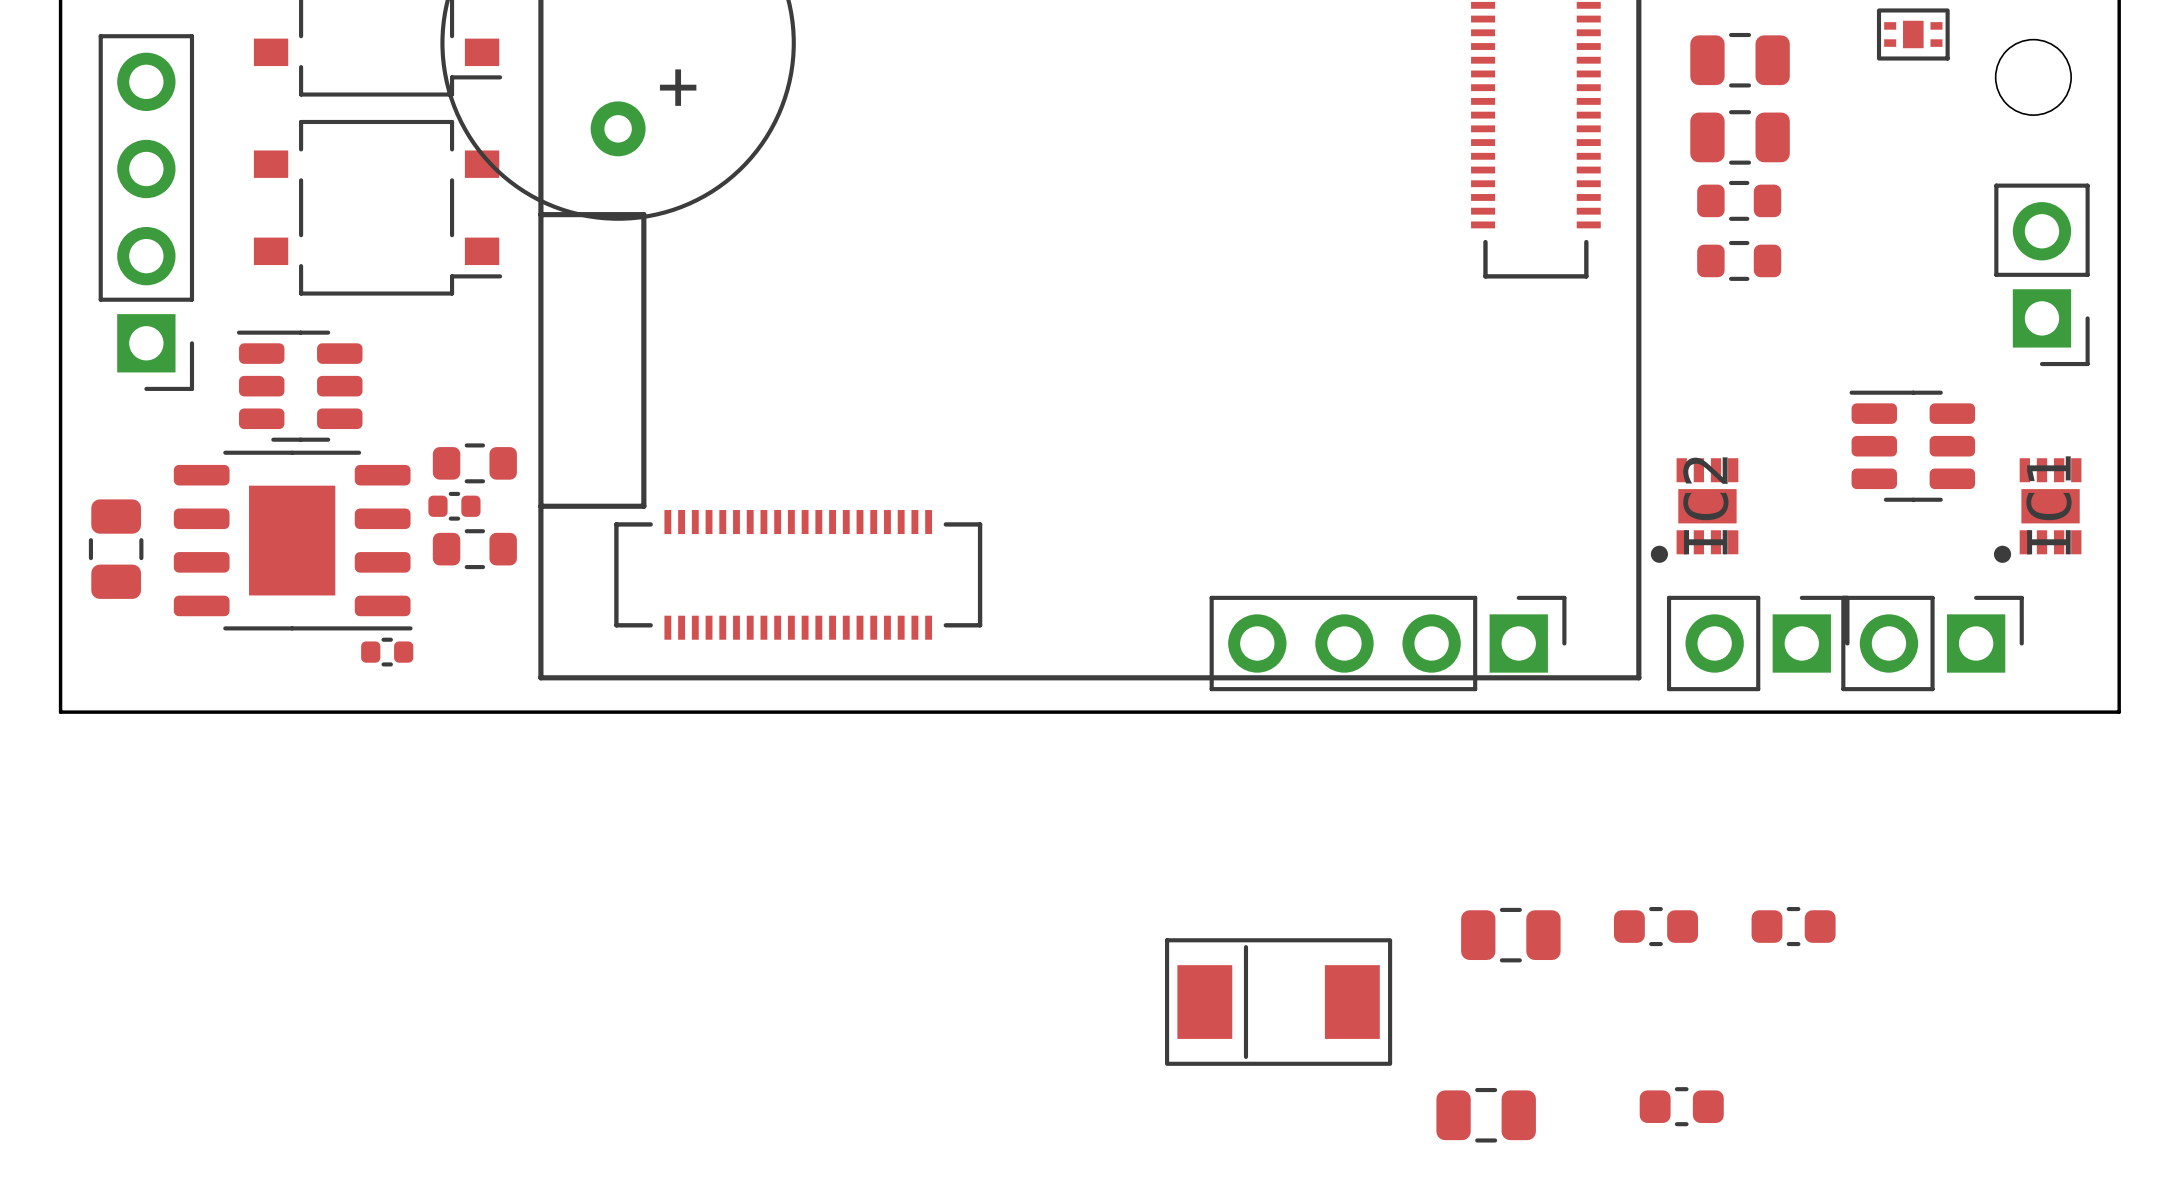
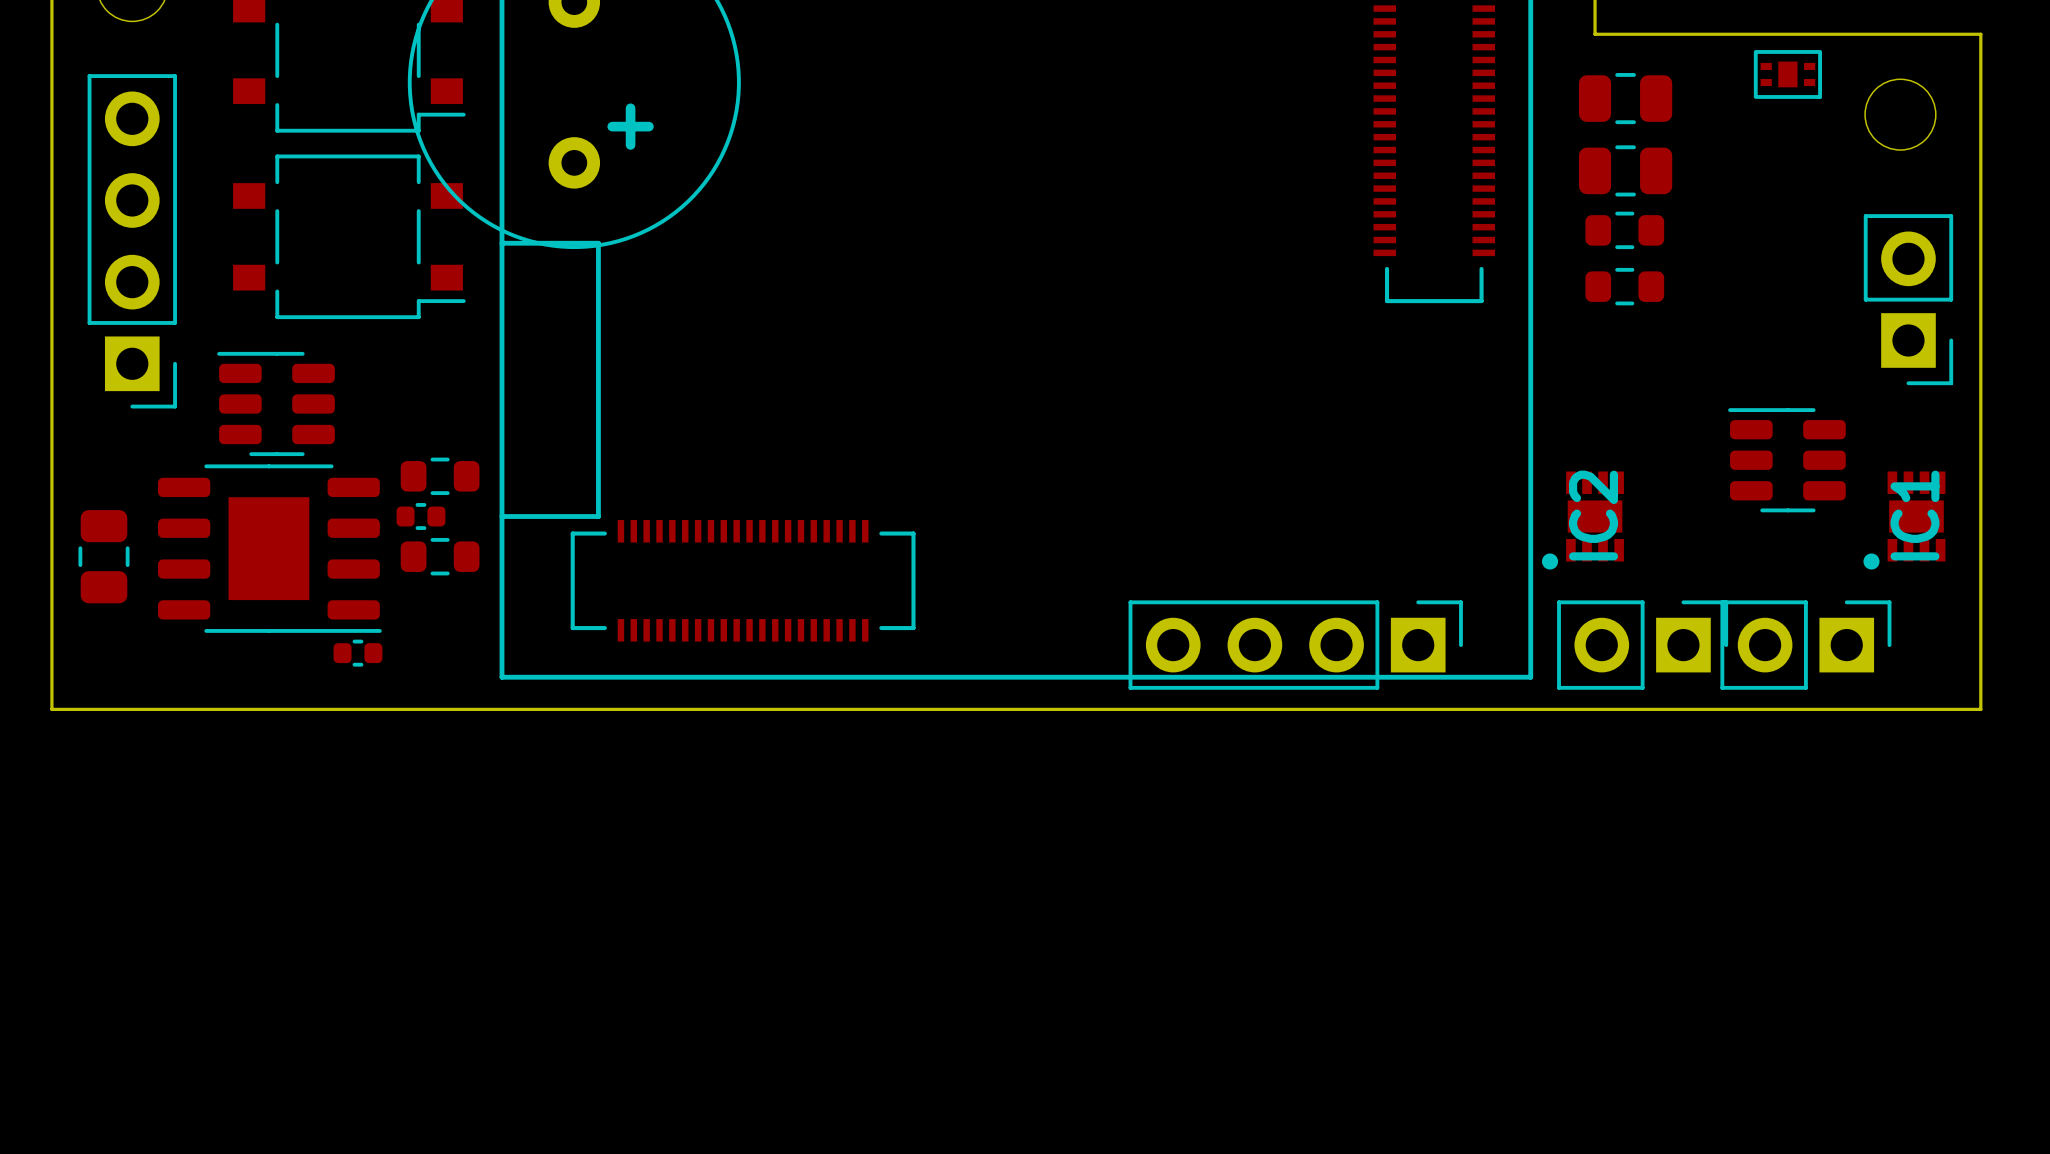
part: (1655, 926) -> none
part: (1793, 926) -> none
part: (1510, 935) -> none
part: (1278, 1002) -> none
part: (1681, 1106) -> none
part: (1486, 1115) -> none

